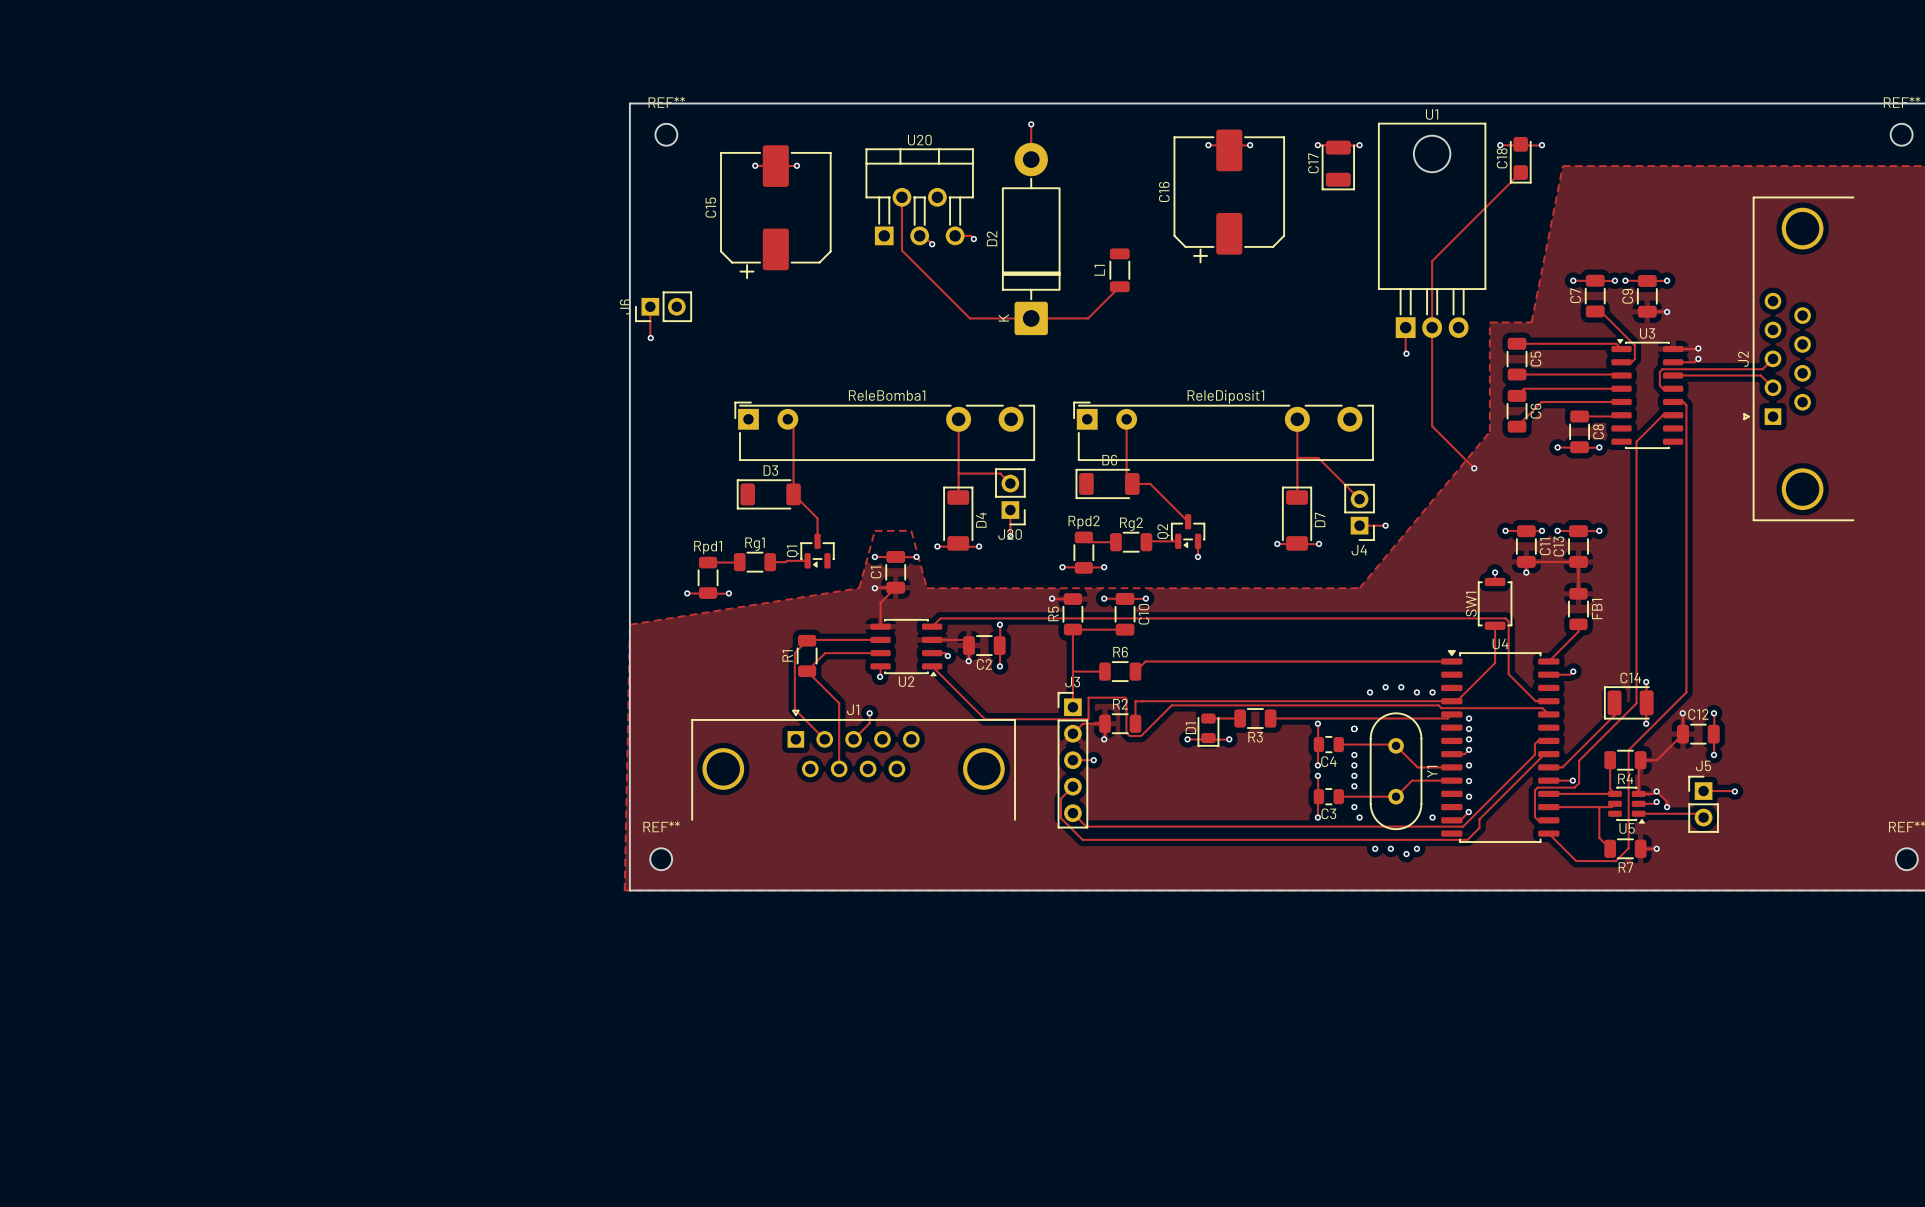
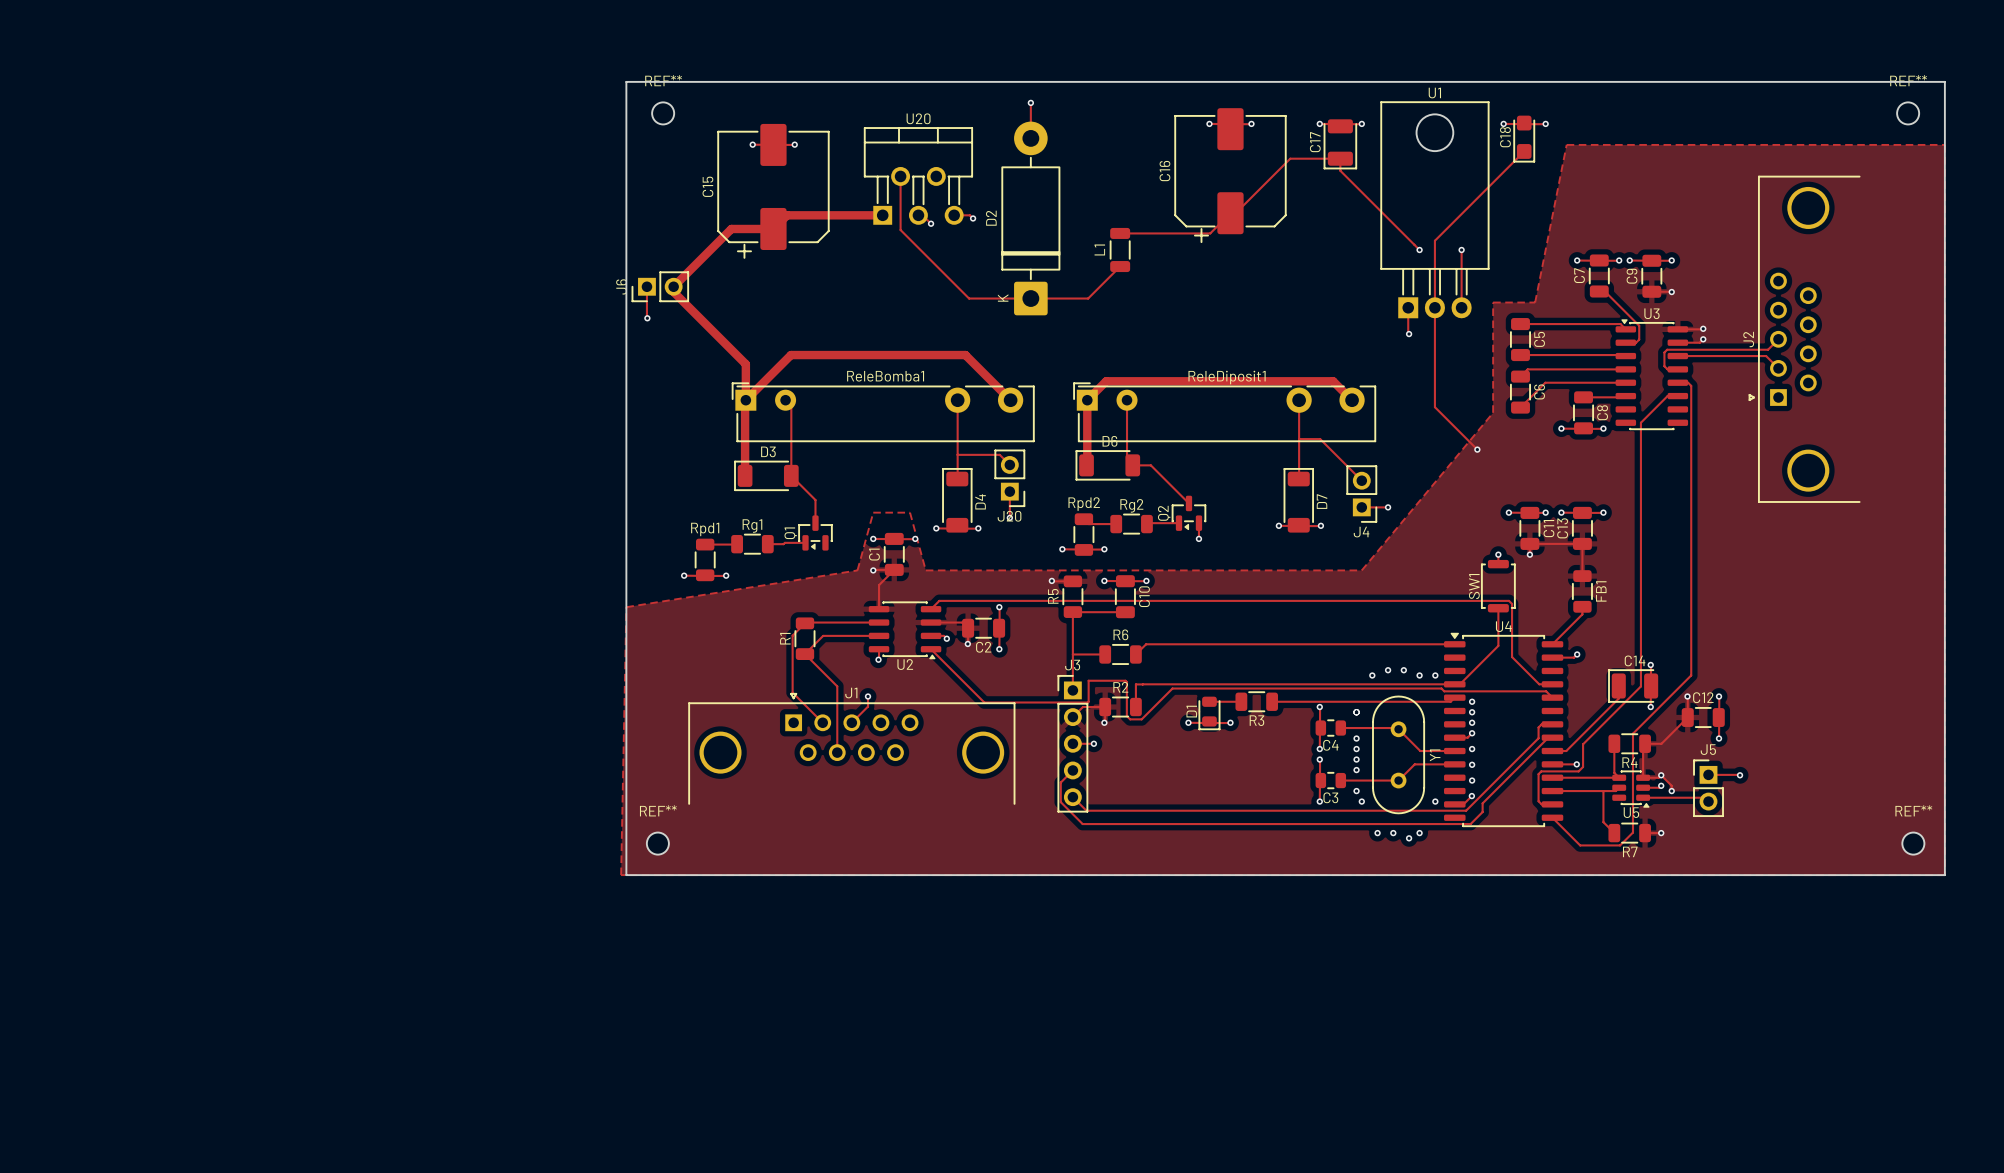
track: none -> (882, 215) (787, 215) (773, 228) (731, 228) (673, 286) (673, 292) (745, 364) (745, 400)
track: none -> (1120, 233) (1210, 233) (1230, 213) (1235, 213) (1290, 158) (1340, 158) (1340, 170) (1419, 249)
via: none -> (1419, 249)
track: none -> (1461, 249) (1461, 307)
via: none -> (1461, 249)
track: none -> (1010, 400) (965, 355) (791, 355) (745, 400) (745, 475)
track: none -> (1352, 400) (1333, 381) (1106, 381) (1087, 400) (1086, 465)

